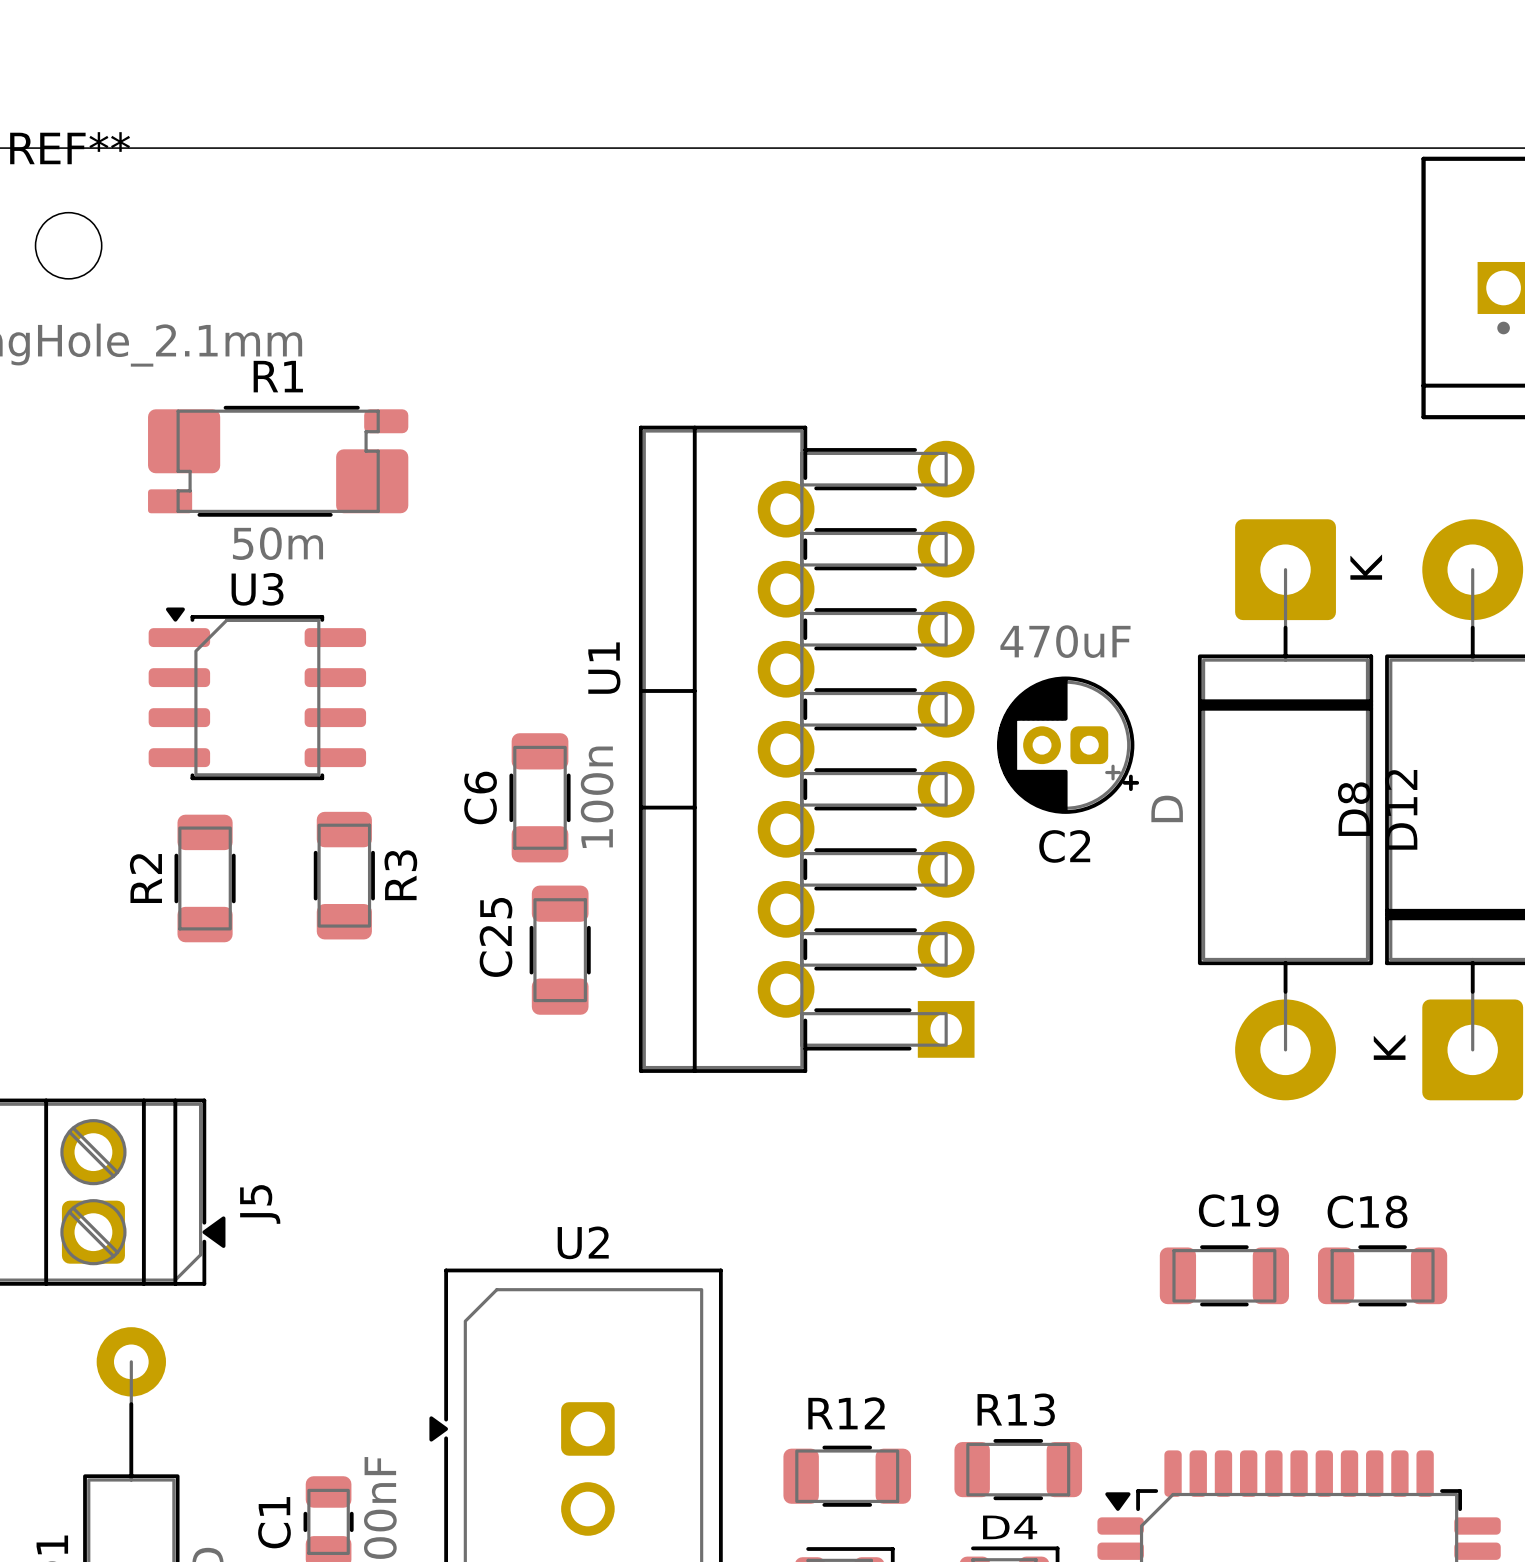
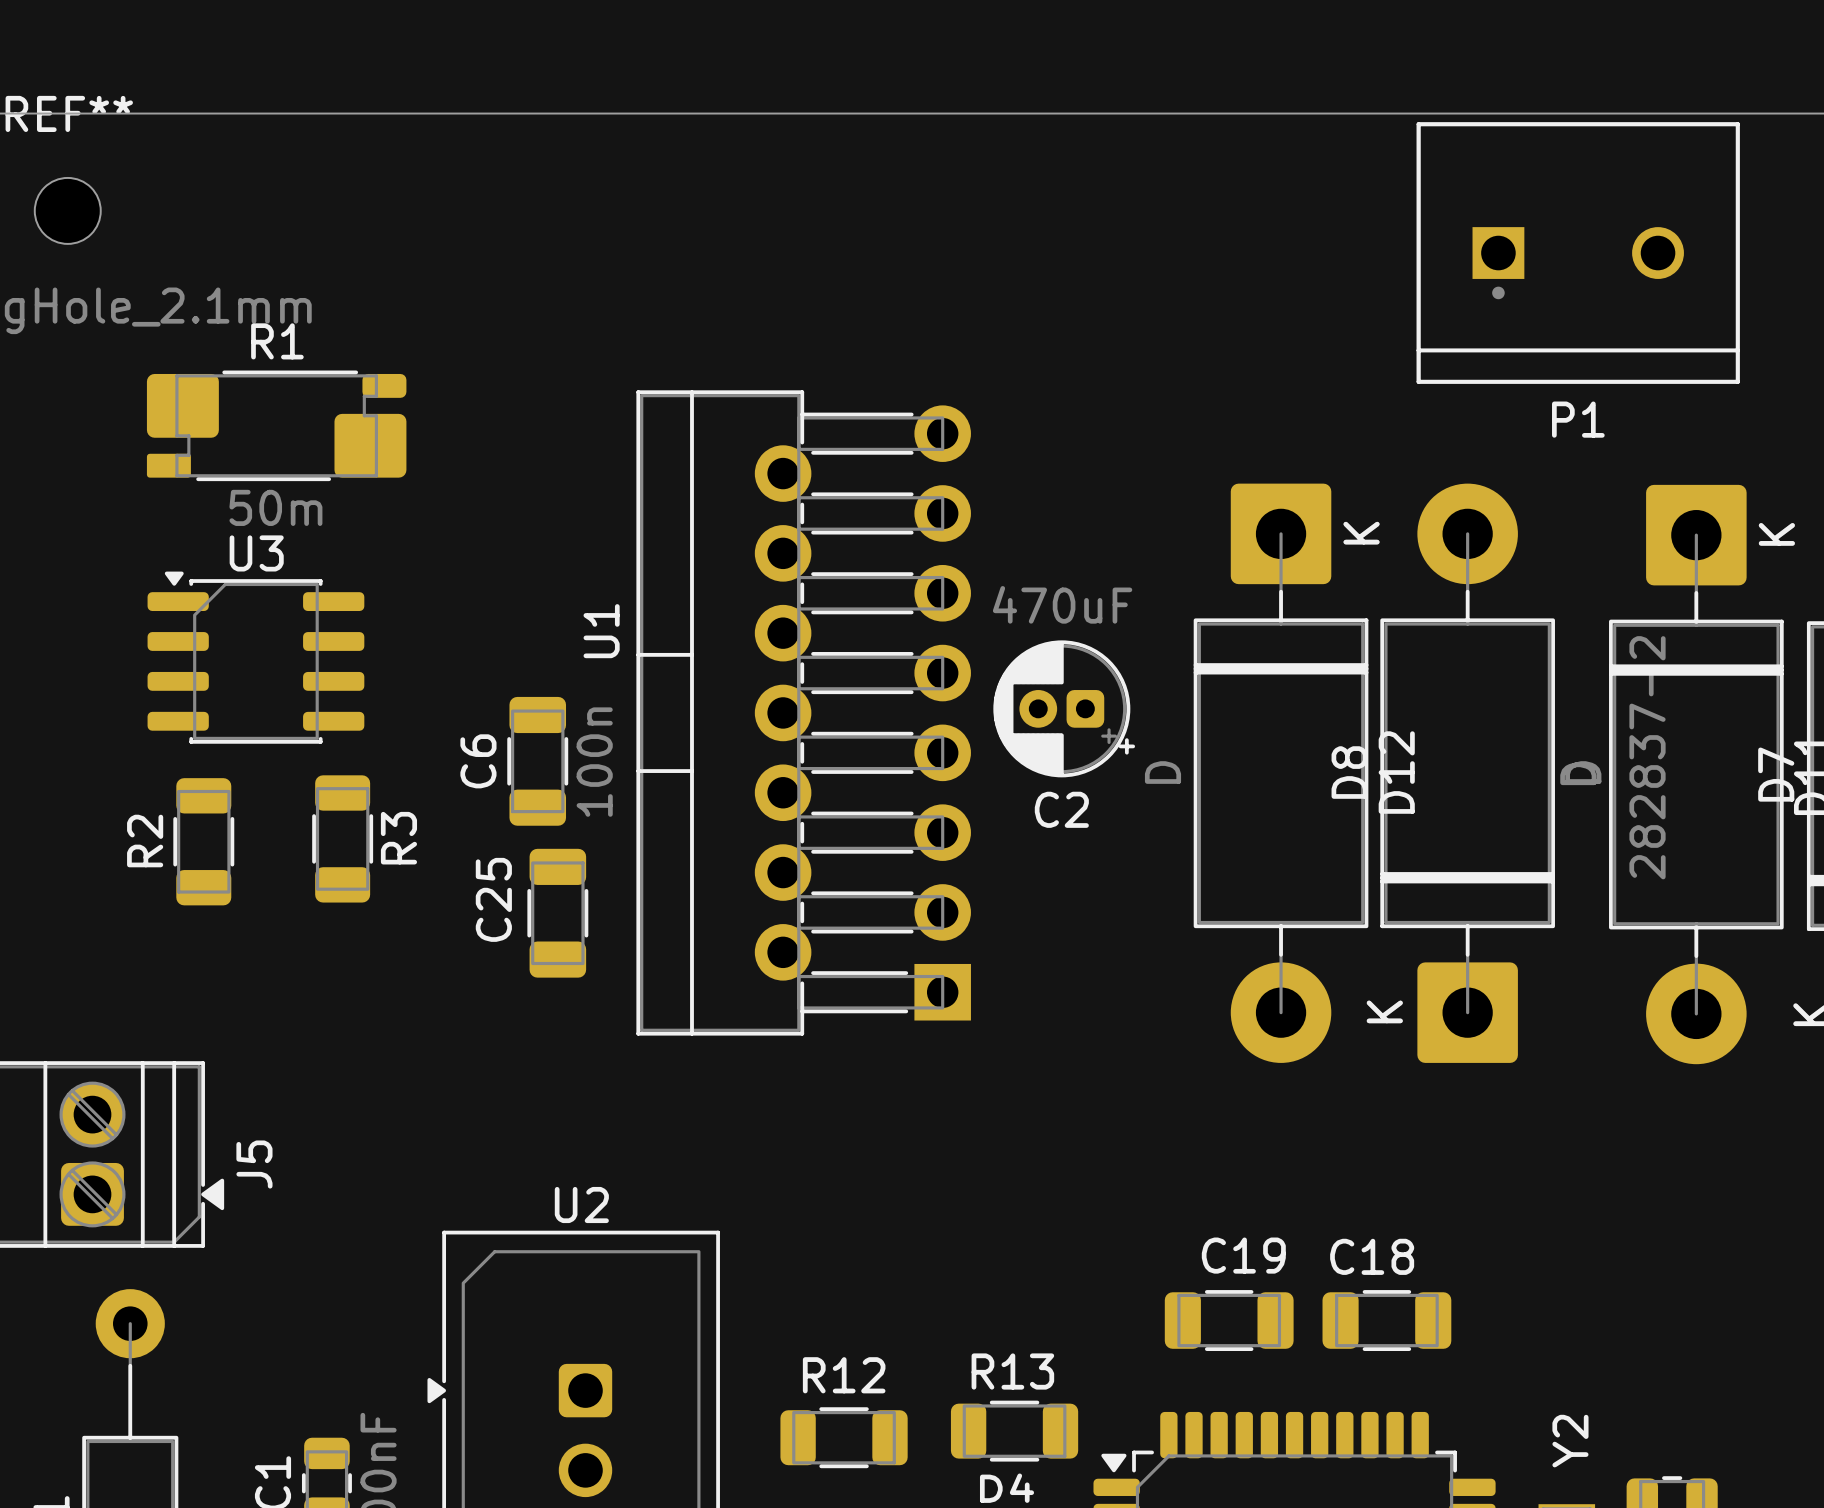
C19 position: (1224, 1275) -> (1229, 1320)
C18 position: (1382, 1275) -> (1386, 1320)

